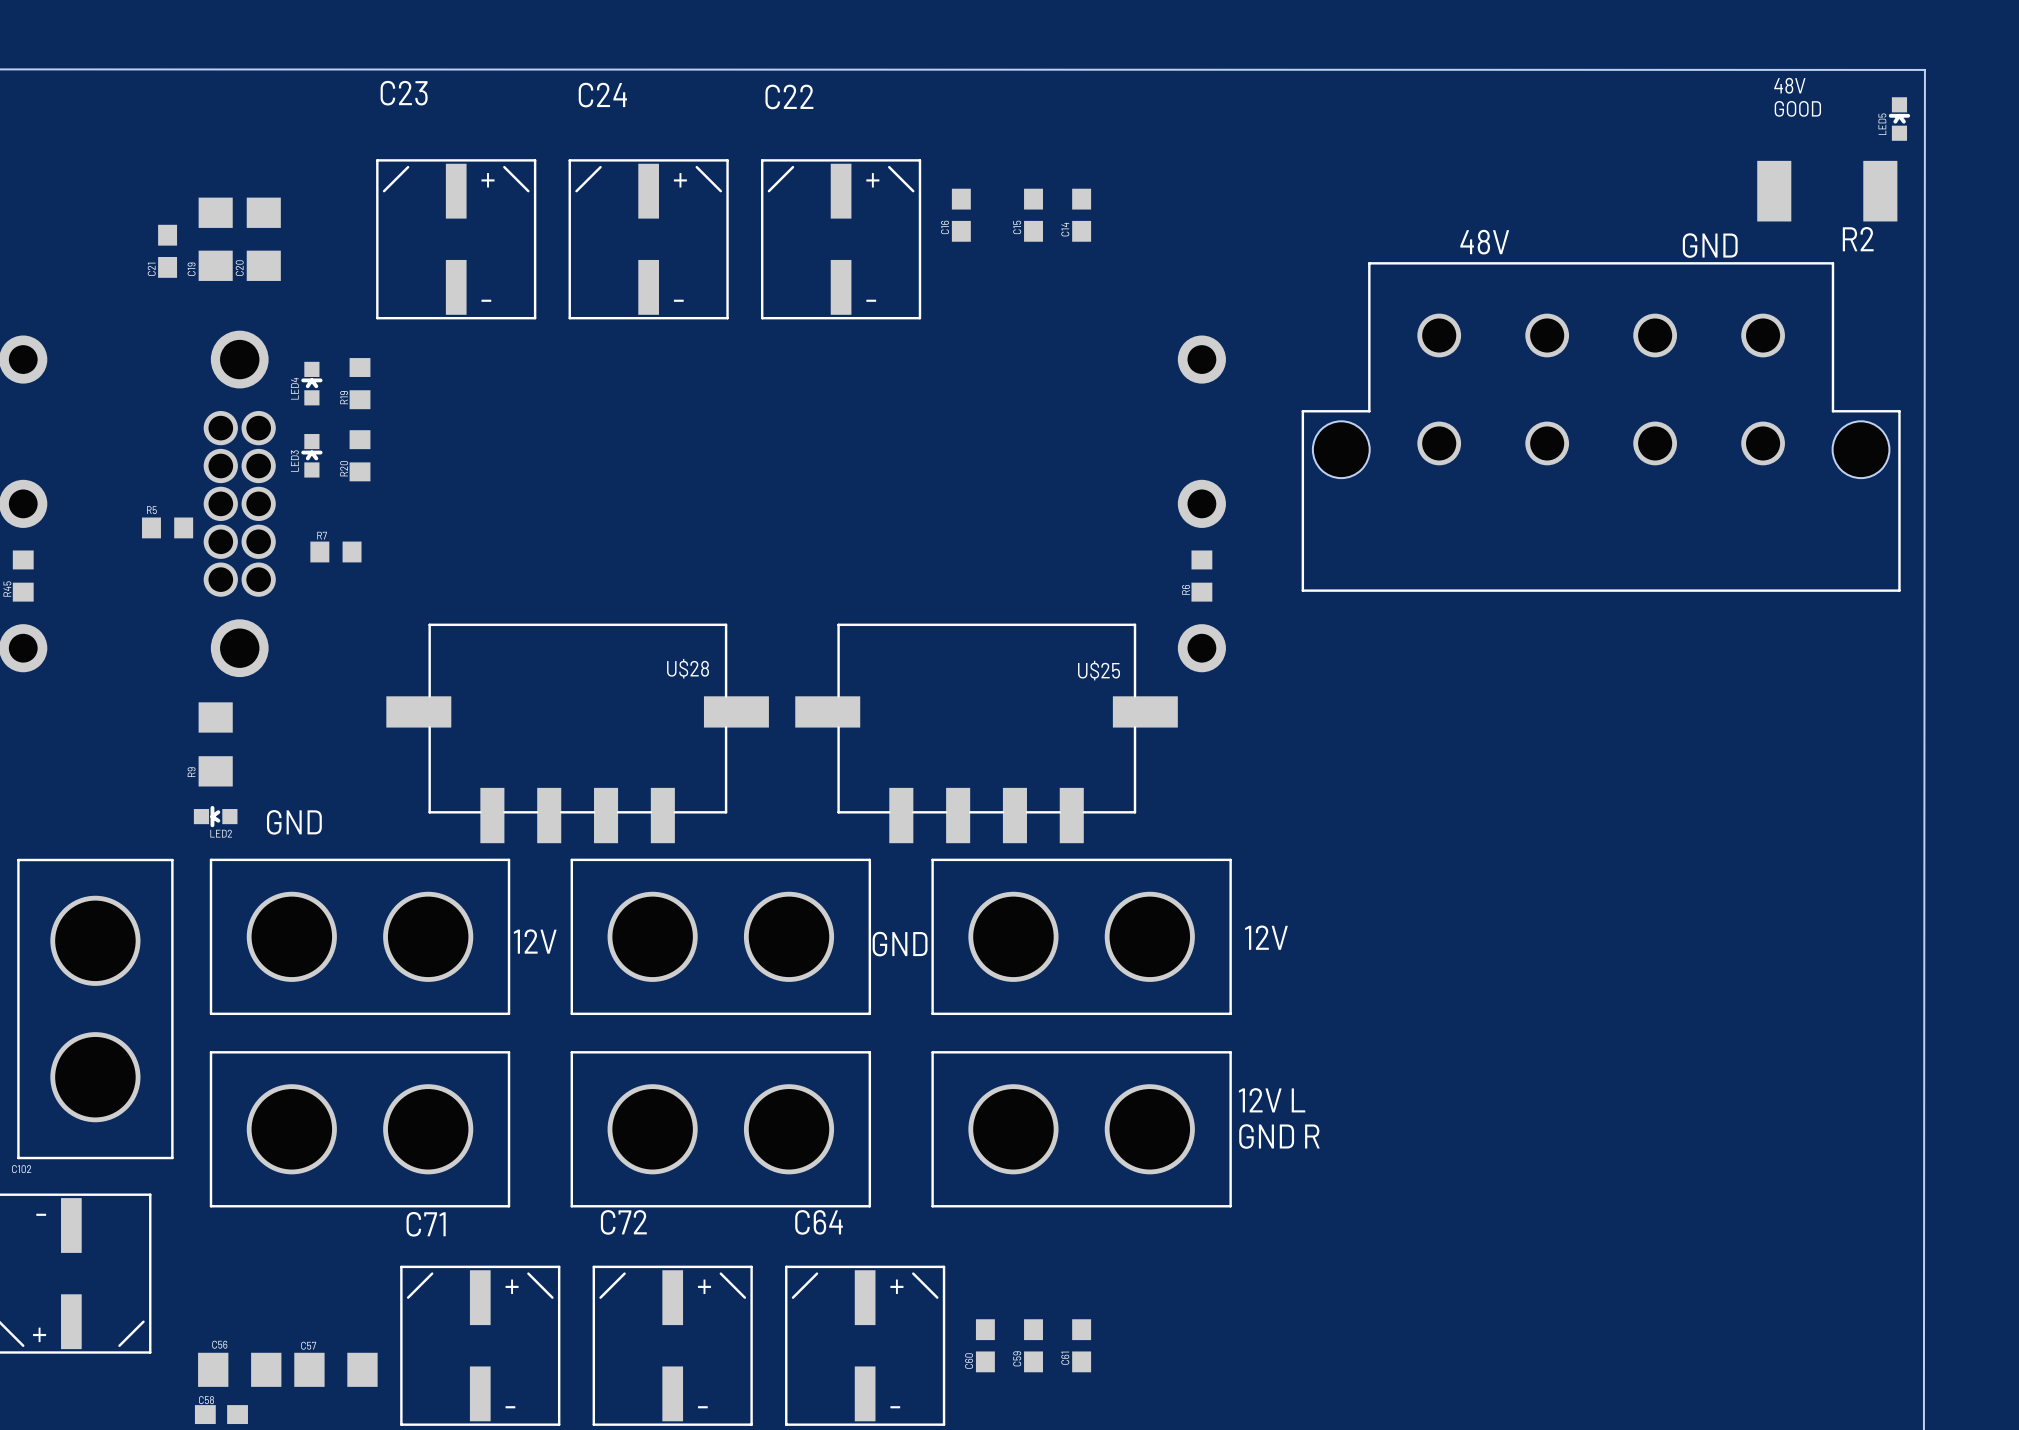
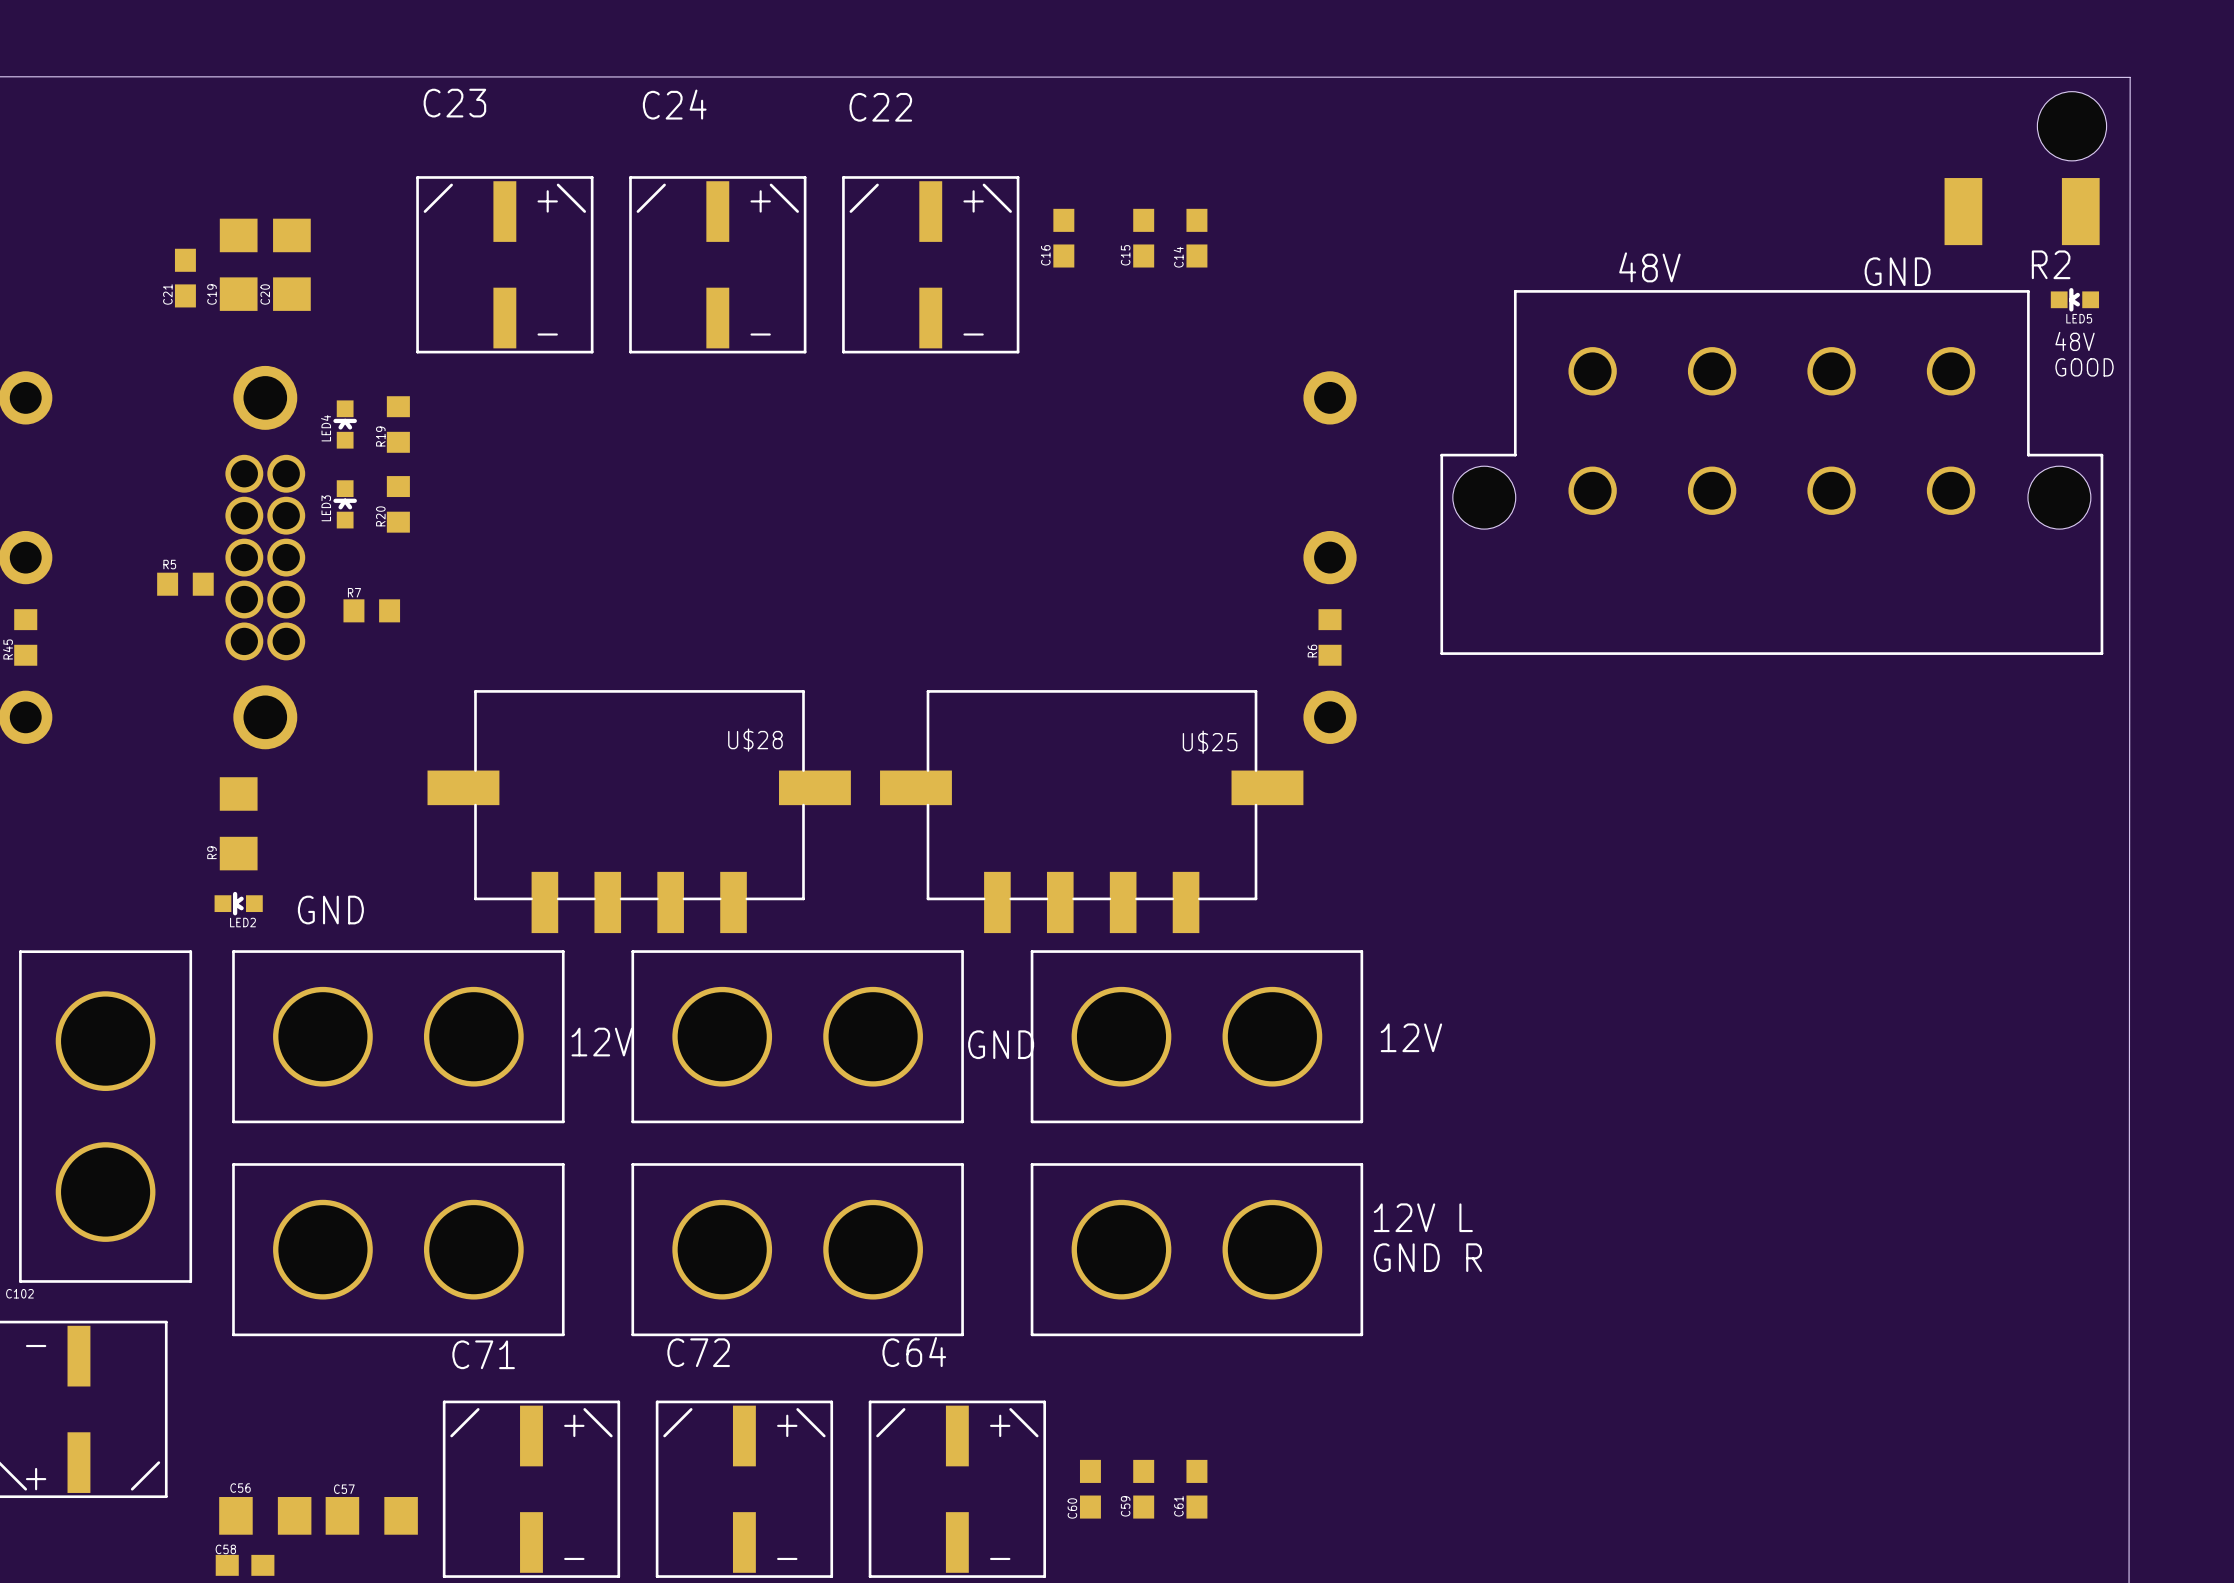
text position: 48V (1789, 85) -> 48V (2075, 341)
text position: GOOD (1797, 108) -> GOOD (2084, 367)
part: none -> (2071, 126)
LED5 rotation: 0° (1899, 119) -> 90° counterclockwise (2074, 299)
LED5 position: (1899, 119) -> (2074, 299)

